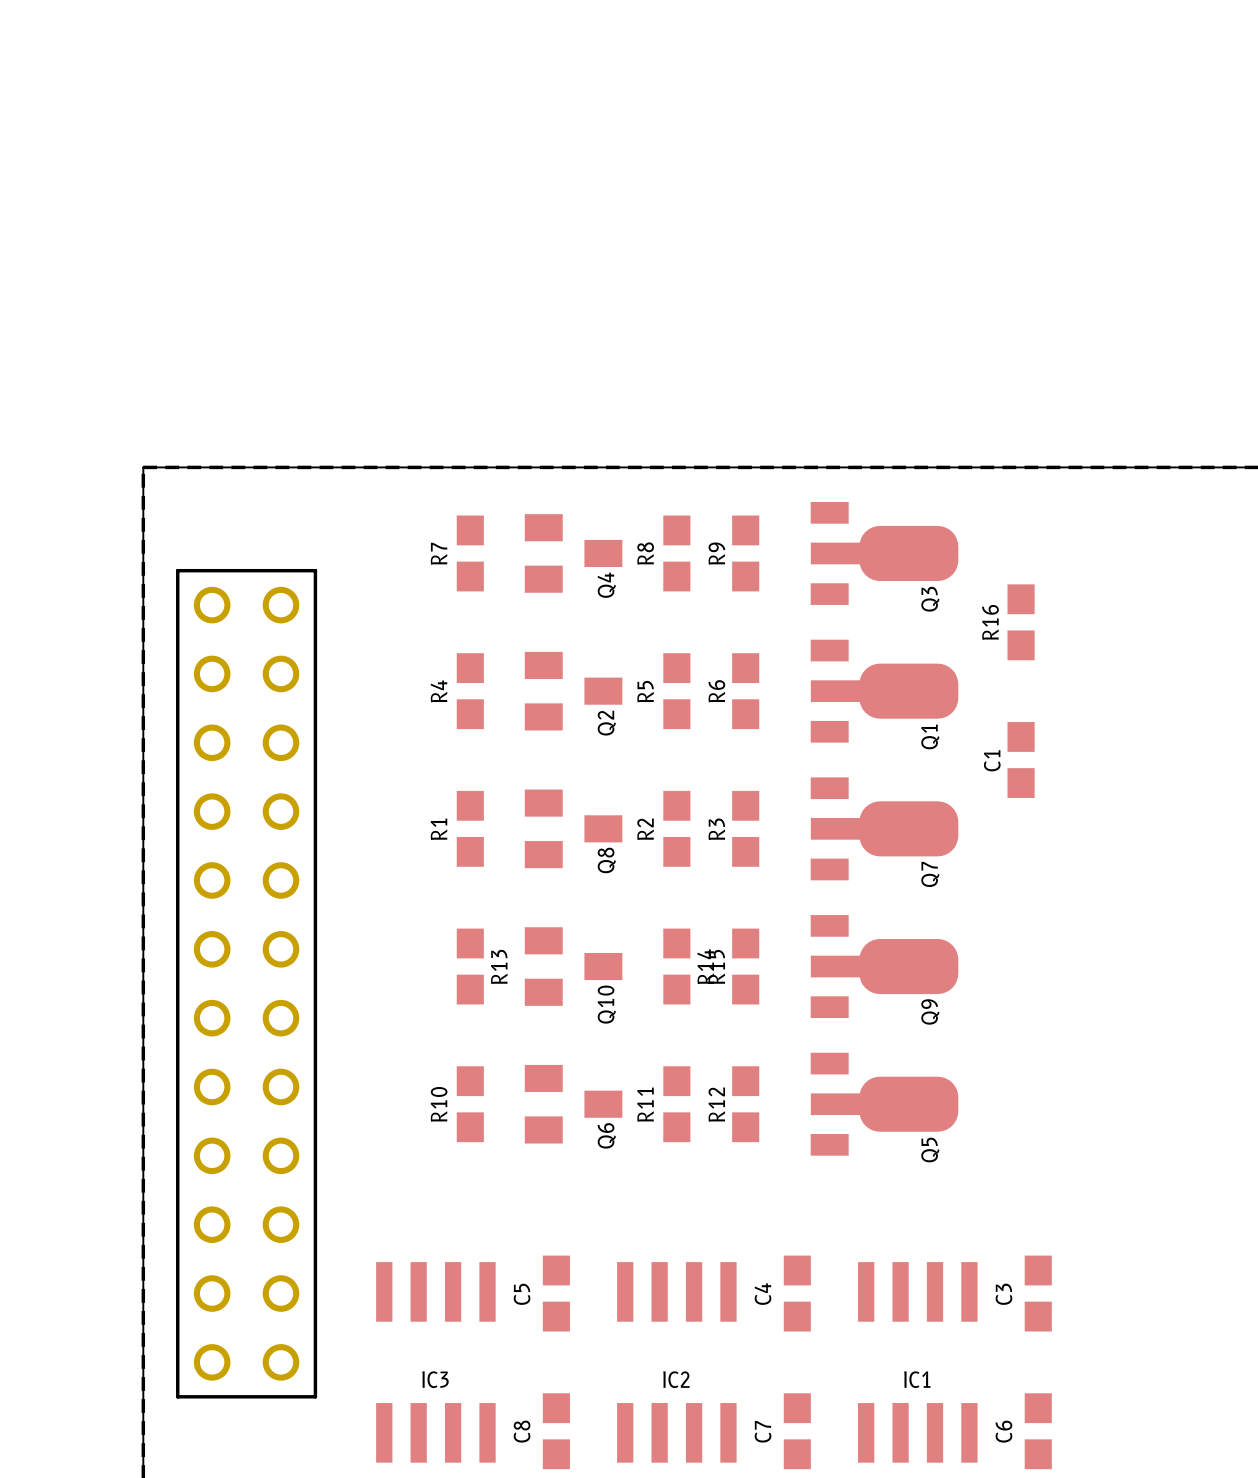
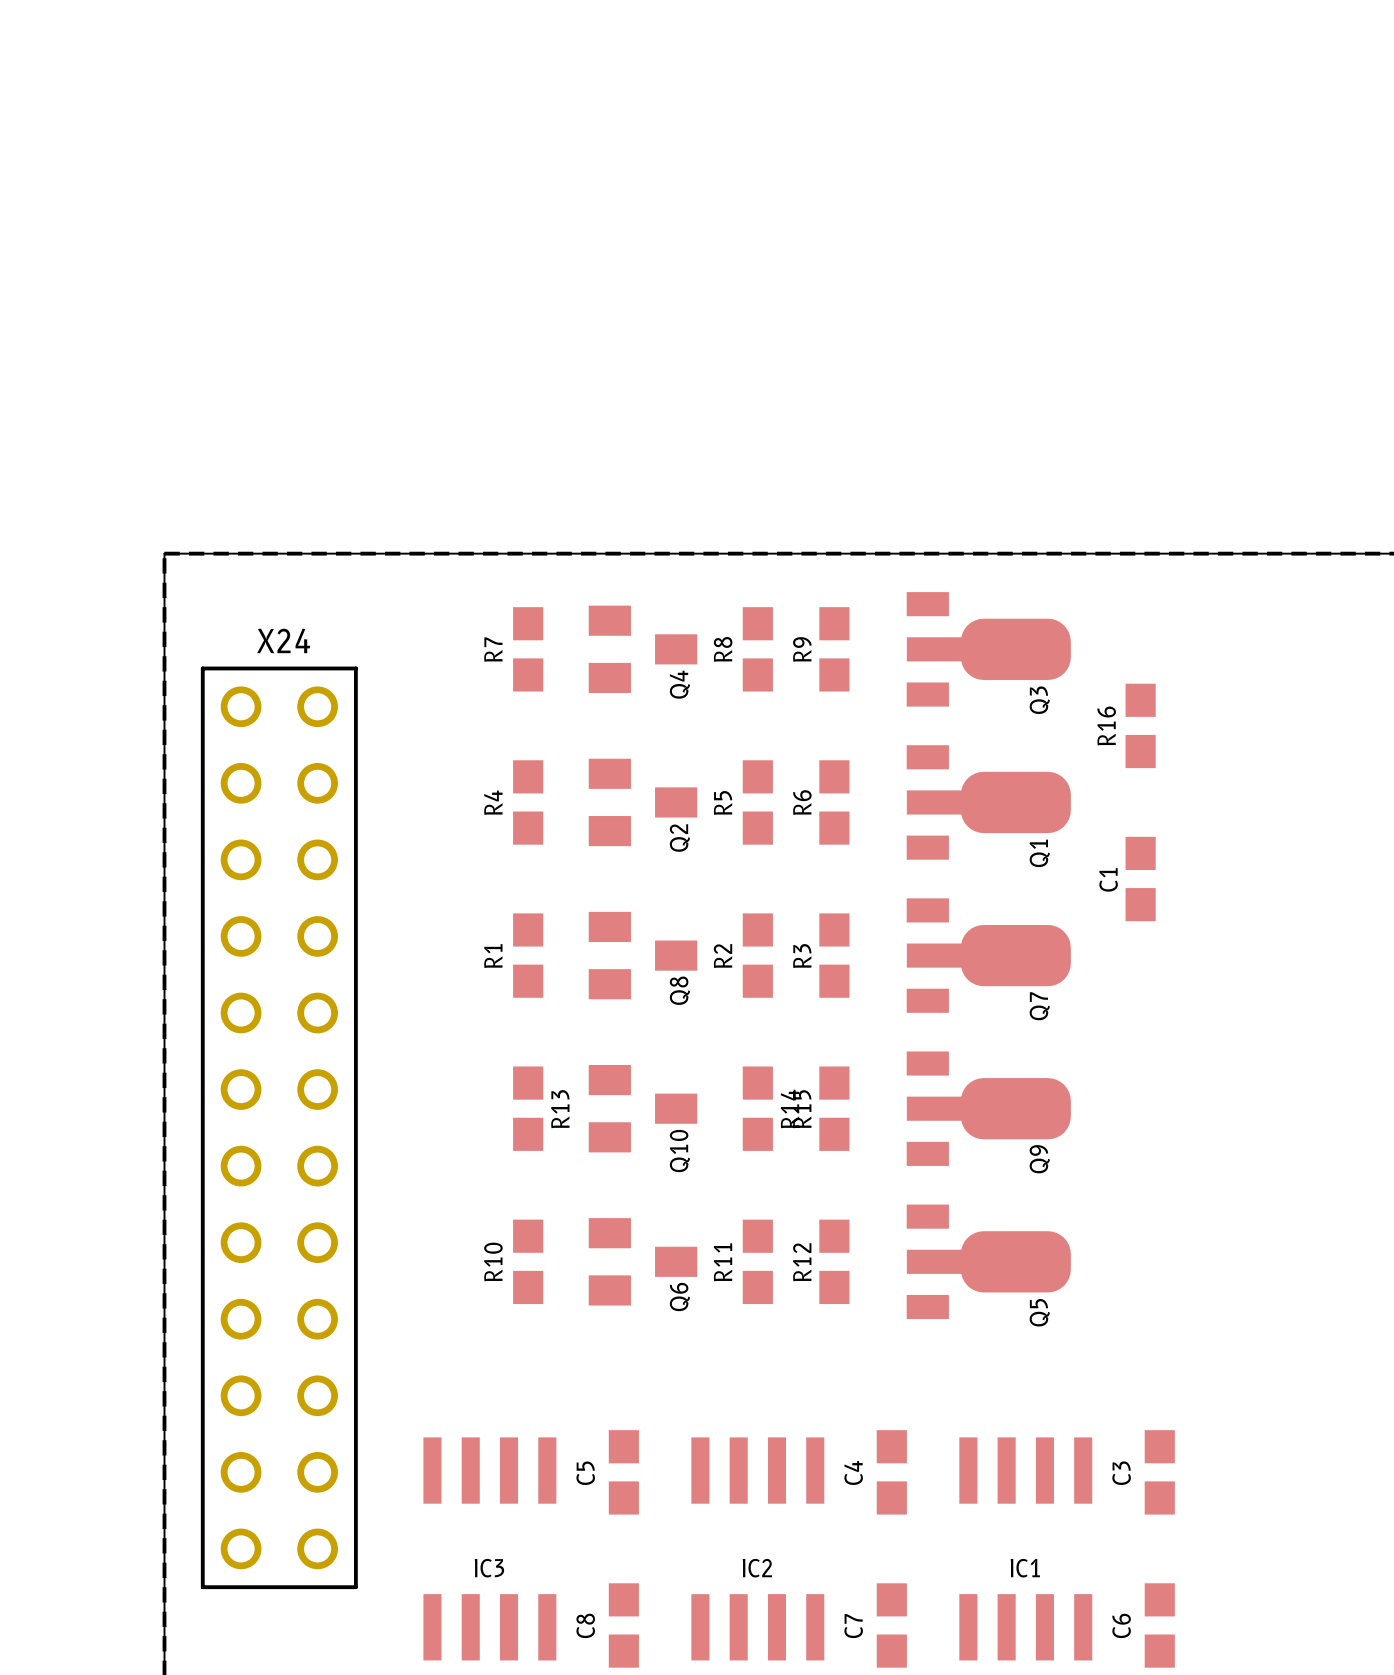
text: none -> X24 (283, 640)

